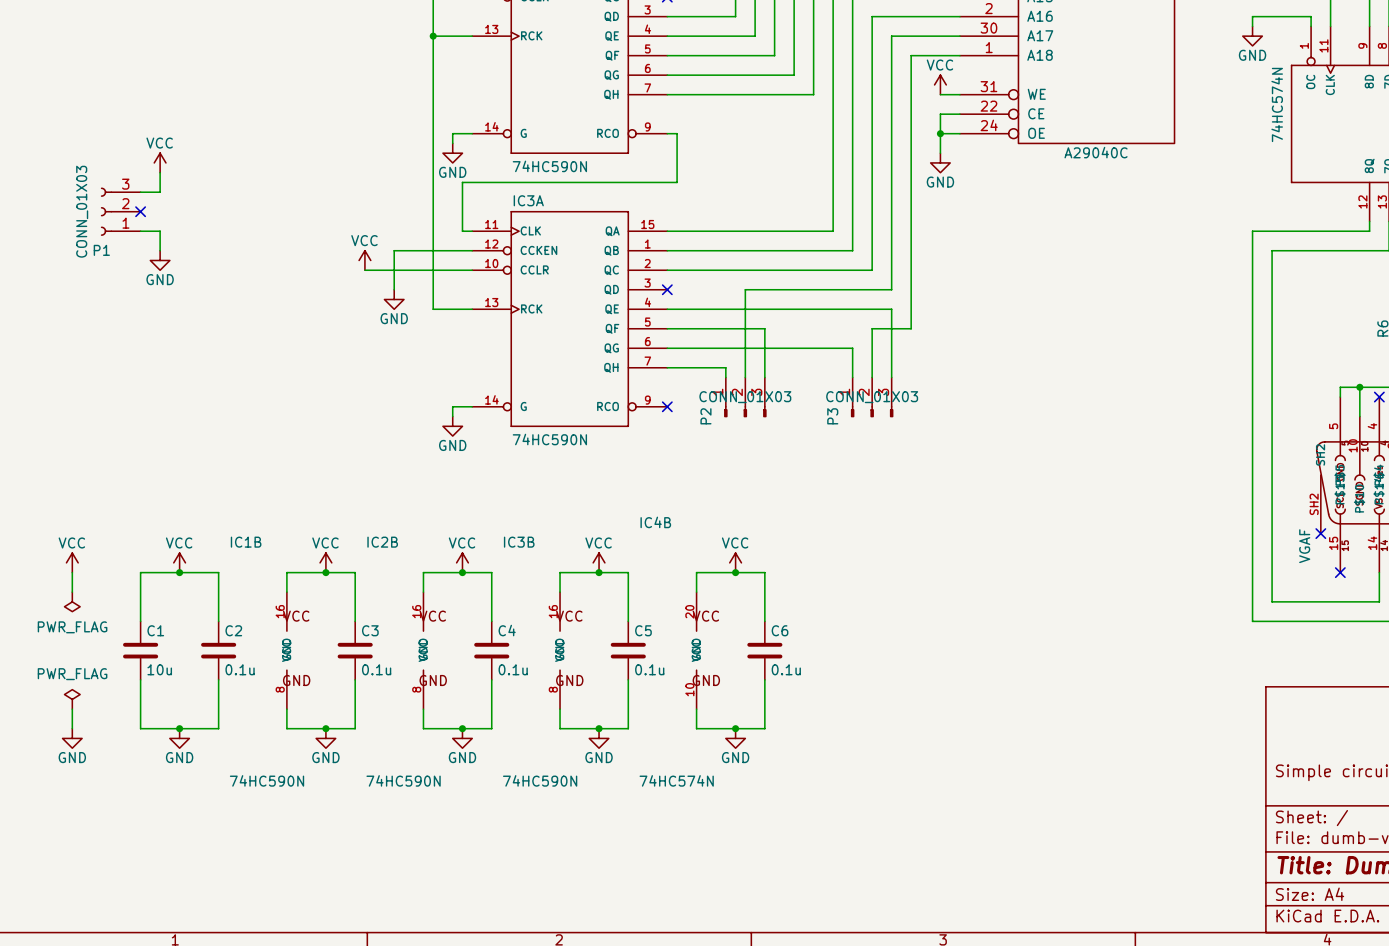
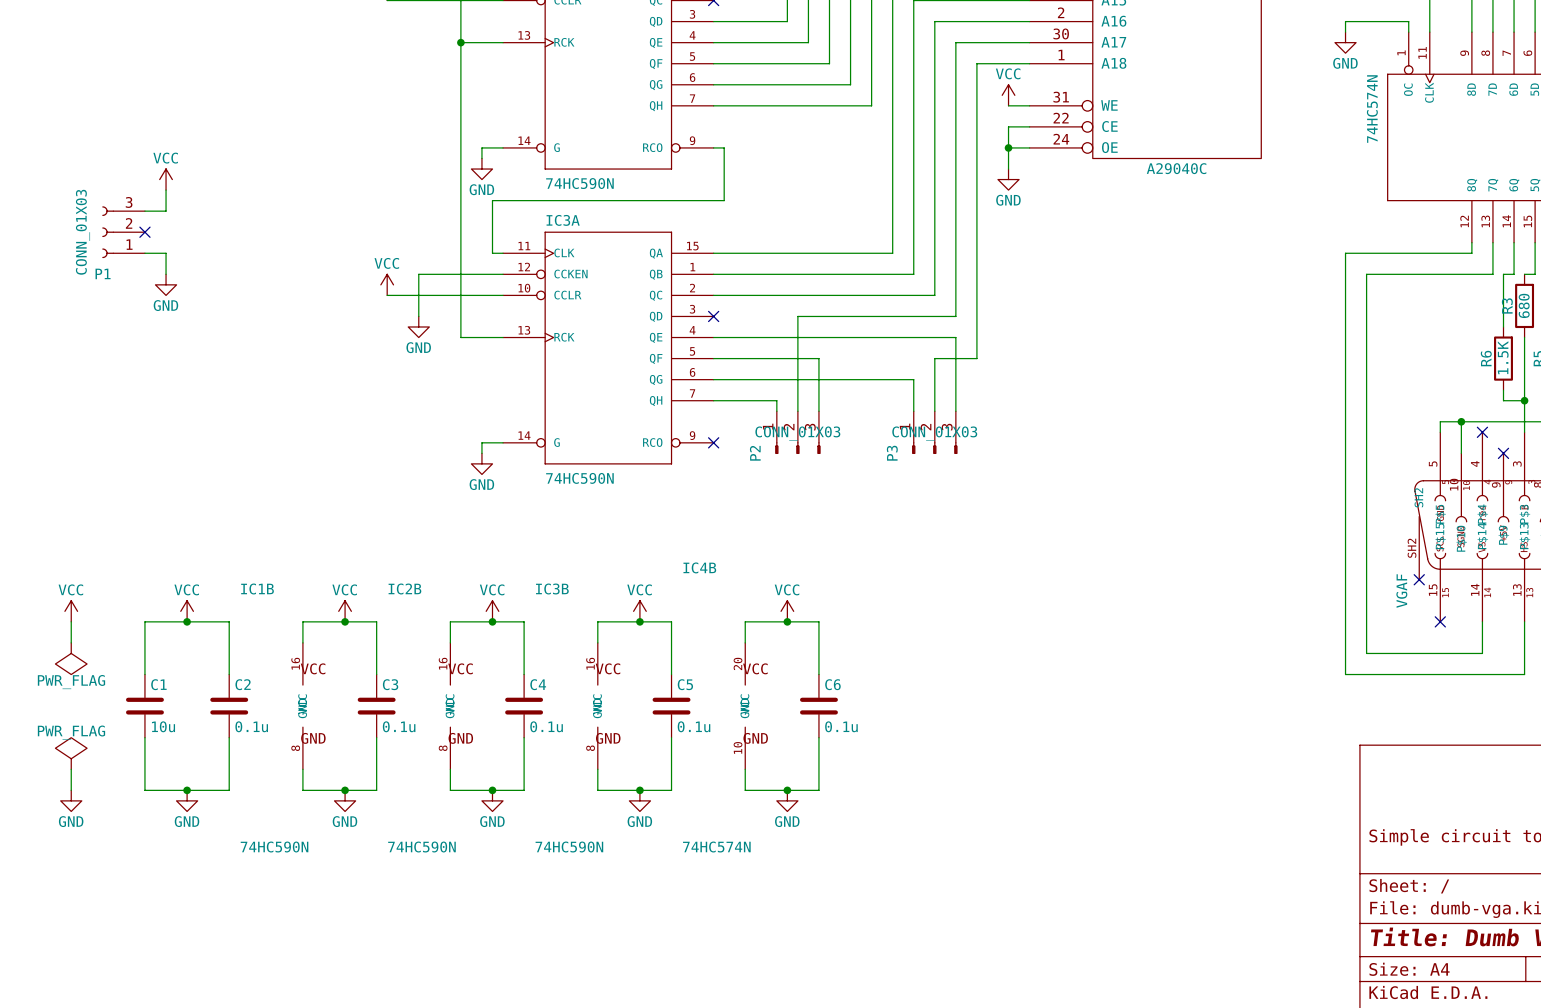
power symbol shape: [64, 592, 81, 612] -> [55, 642, 88, 675]
power symbol shape: [64, 689, 81, 710] -> [55, 737, 88, 770]

